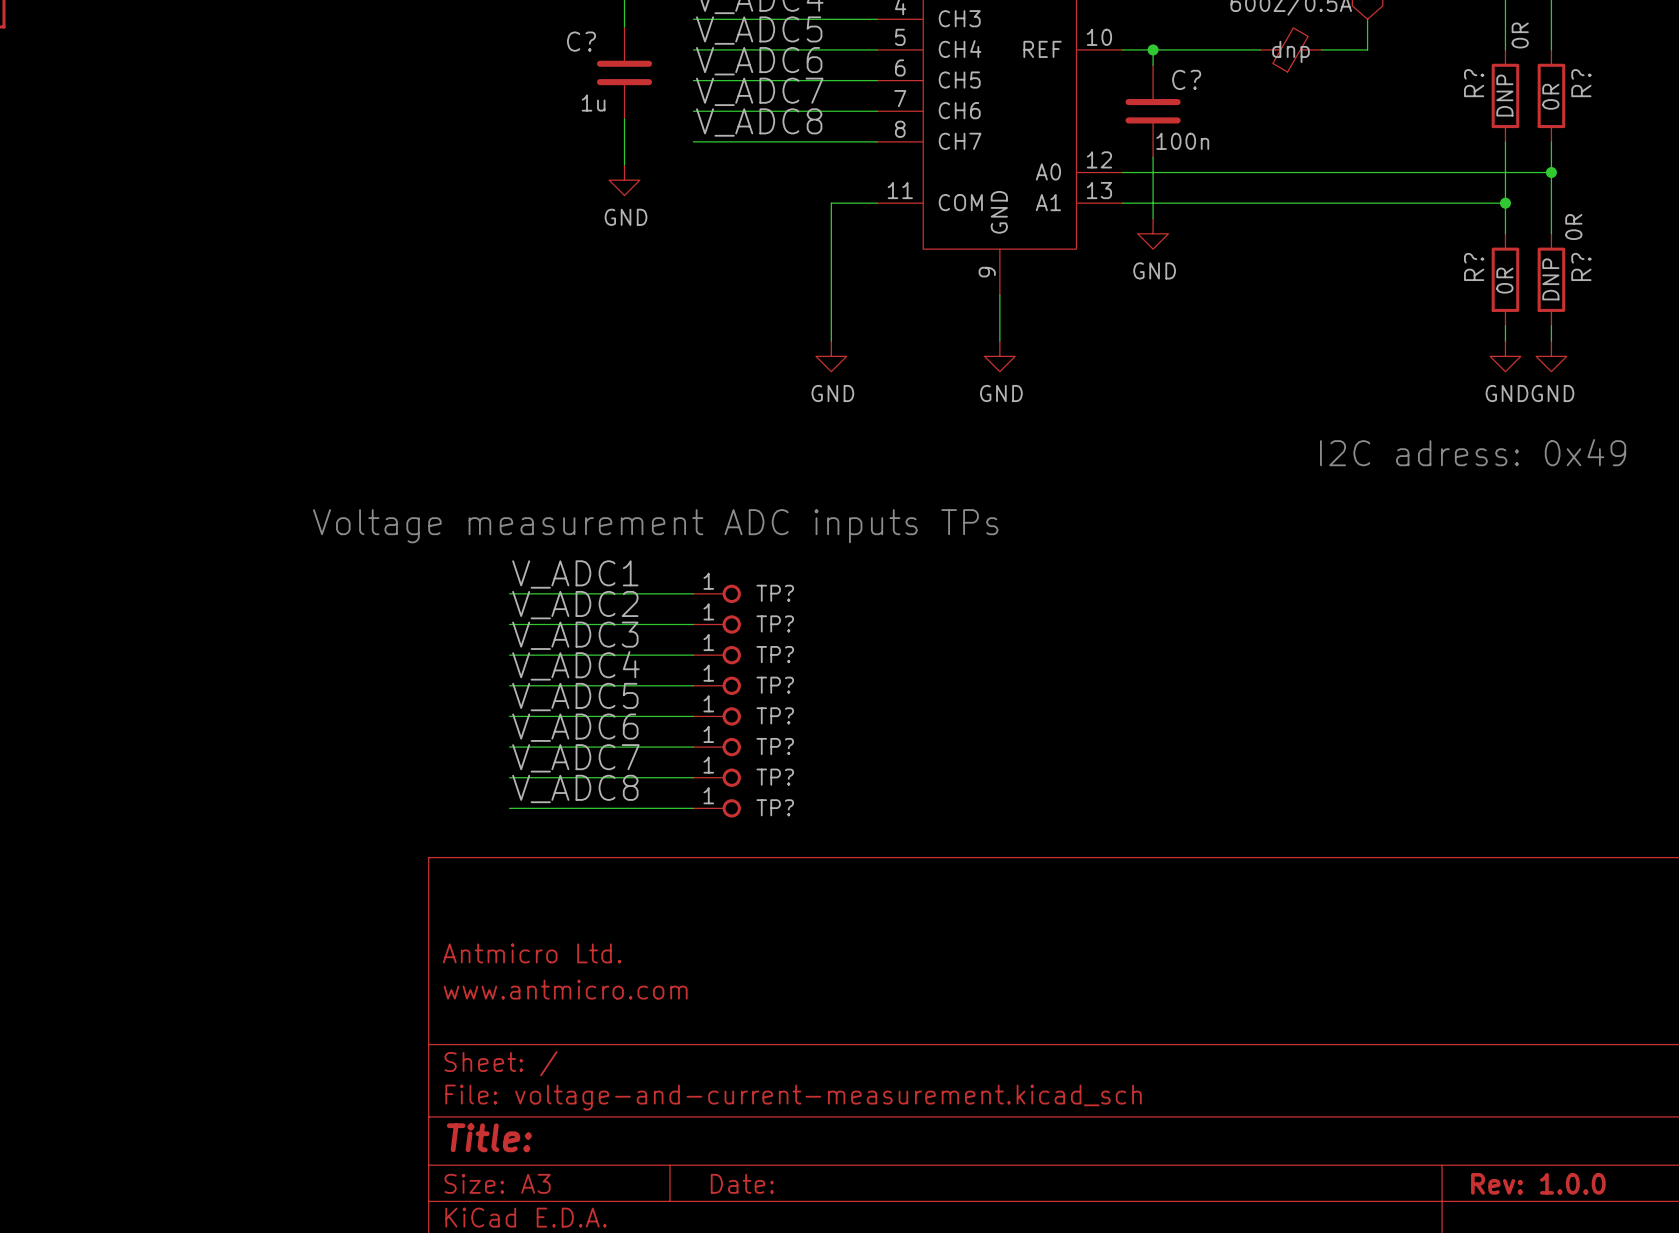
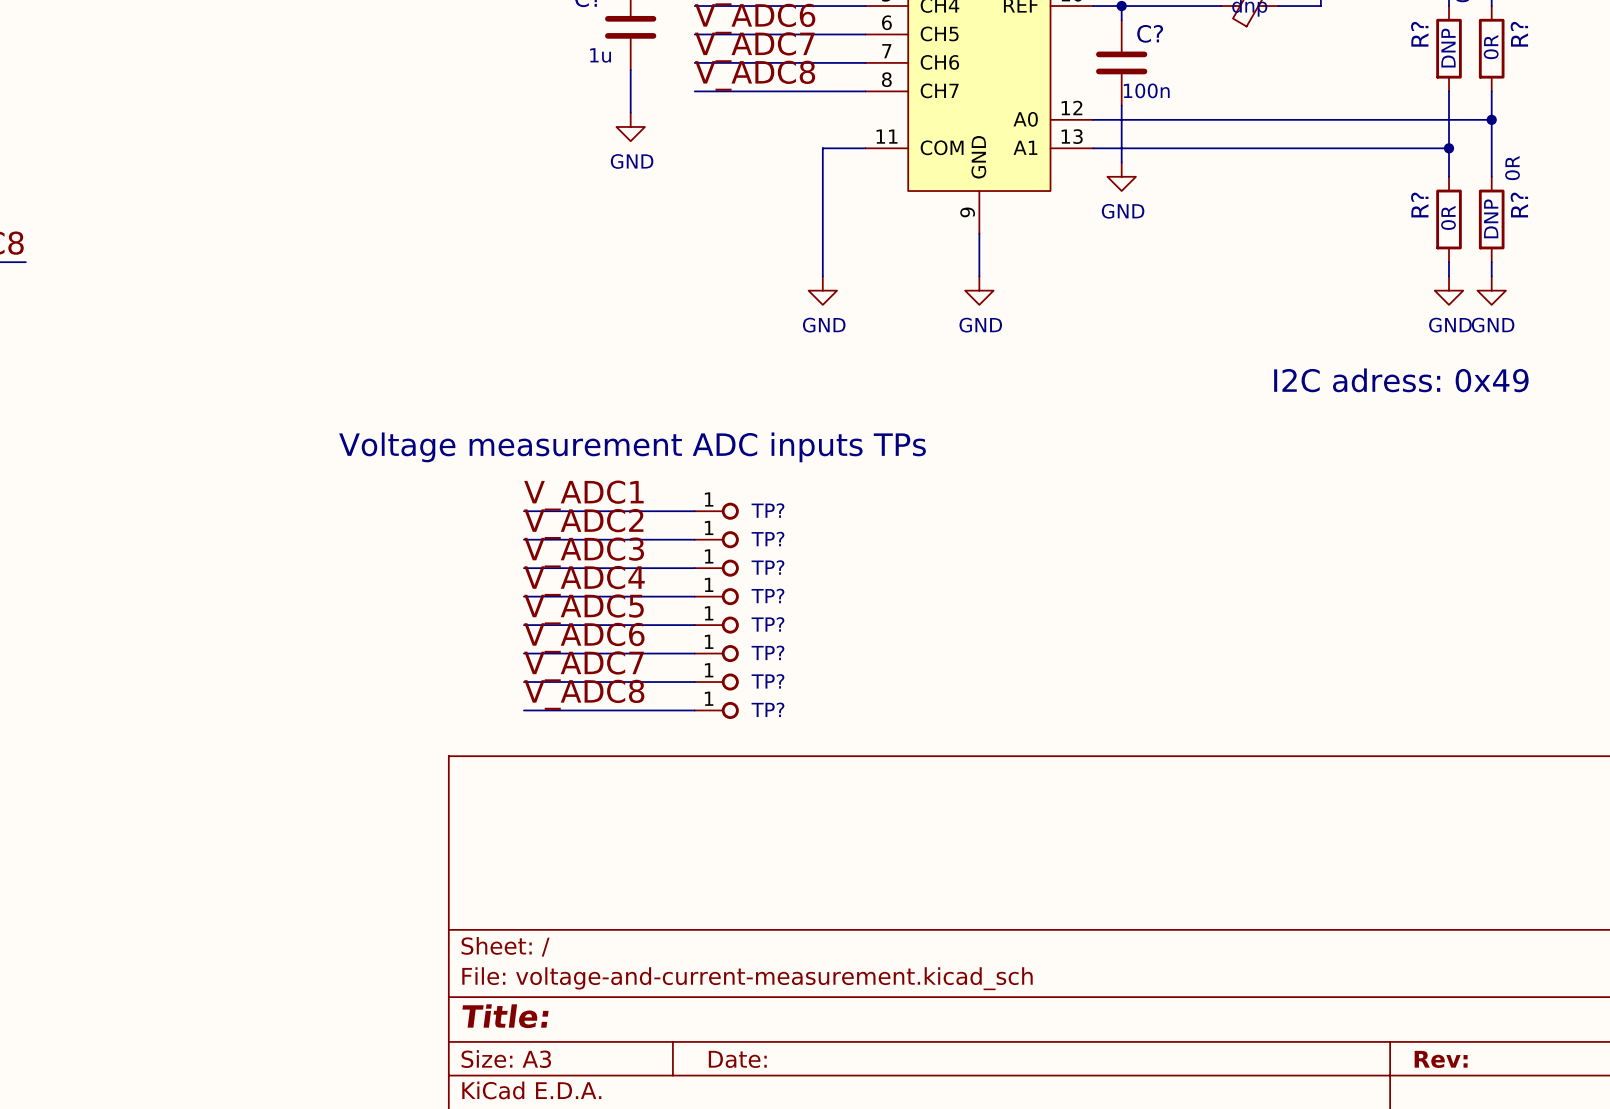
title block: Antmicro Ltd. (532, 953) -> none
title block: www.antmicro.com (565, 989) -> none
title block: Rev: 1.0.0 (1538, 1183) -> Rev: (1441, 1059)

